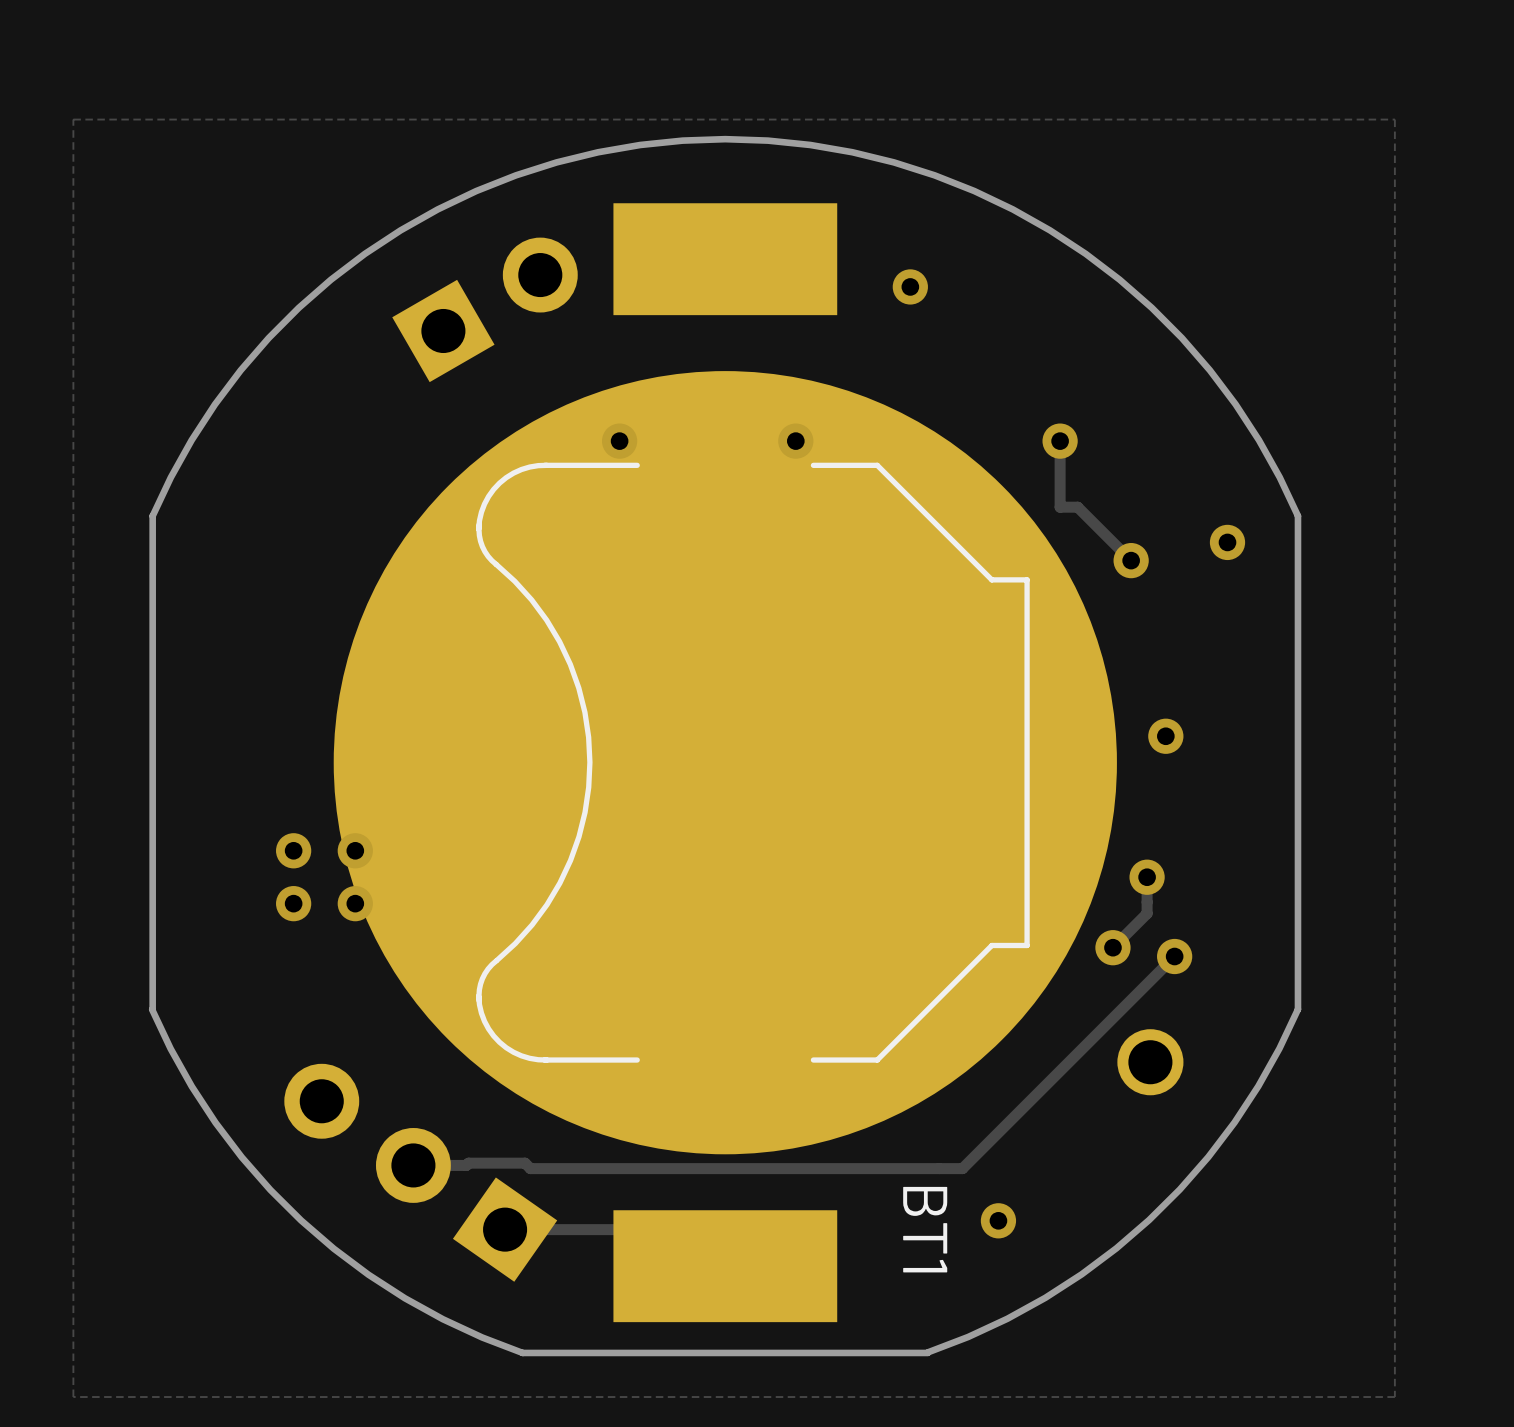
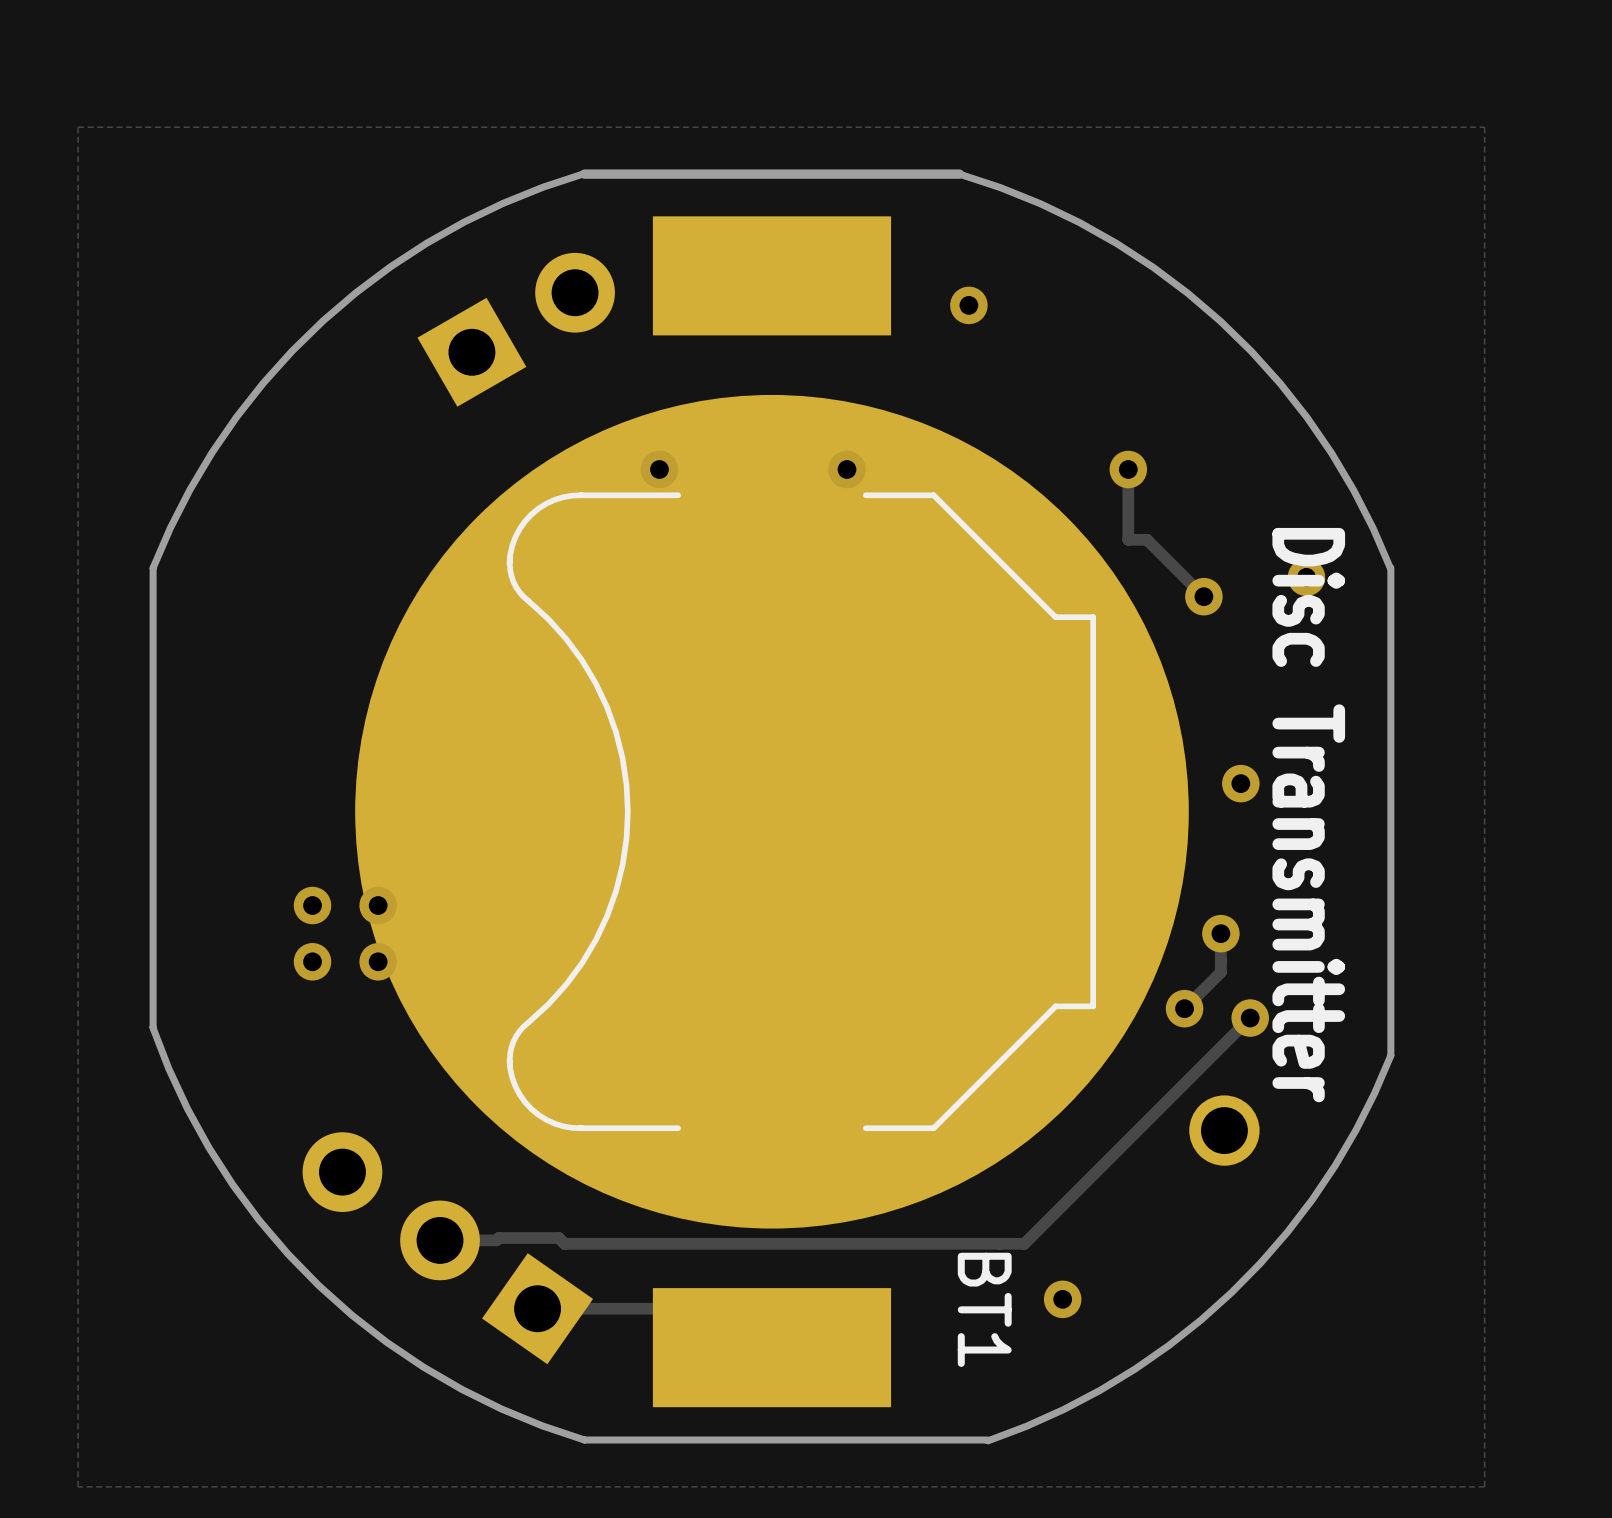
board edge: none -> (584, 173) (543, 187) (464, 222) (390, 266) (323, 320) (292, 351) (236, 417) (212, 452) (170, 528) (153, 567) (153, 1027)
board edge: none -> (584, 174) (959, 174) (1000, 187) (1079, 222) (1153, 267) (1187, 293) (1251, 351) (1307, 417) (1331, 453) (1353, 490) (1390, 568)
text: none -> Disc Transmitter (1308, 815)
board edge: (152, 1009) (170, 1048) (191, 1086) (215, 1122) (241, 1157) (270, 1189) (301, 1220) (333, 1248) (368, 1274) (404, 1298) (442, 1319) (482, 1337) (522, 1352) (549, 1352) -> (152, 1027) (187, 1108) (232, 1184) (288, 1254) (318, 1285) (386, 1342) (461, 1389) (542, 1425) (584, 1440)
board edge: (152, 1009) (152, 516) (191, 440) (215, 404) (240, 370) (298, 307) (330, 279) (400, 230) (476, 191) (556, 162) (640, 144) (725, 139) (810, 144) (893, 162) (974, 191) (1012, 209) (1085, 253) (1119, 279) (1181, 338) (1235, 404) (1258, 440) (1297, 516) (1297, 1009) (1279, 1048) (1258, 1086) (1234, 1122) (1208, 1156) (1179, 1189) (1149, 1220) (1116, 1248) (1081, 1274) (1045, 1297) (1007, 1318) (968, 1336) (927, 1352) -> (1390, 567) (1390, 1055) (1374, 1093) (1335, 1165) (1312, 1199) (1260, 1263) (1201, 1319) (1135, 1368) (1100, 1390) (1063, 1409) (987, 1440)

